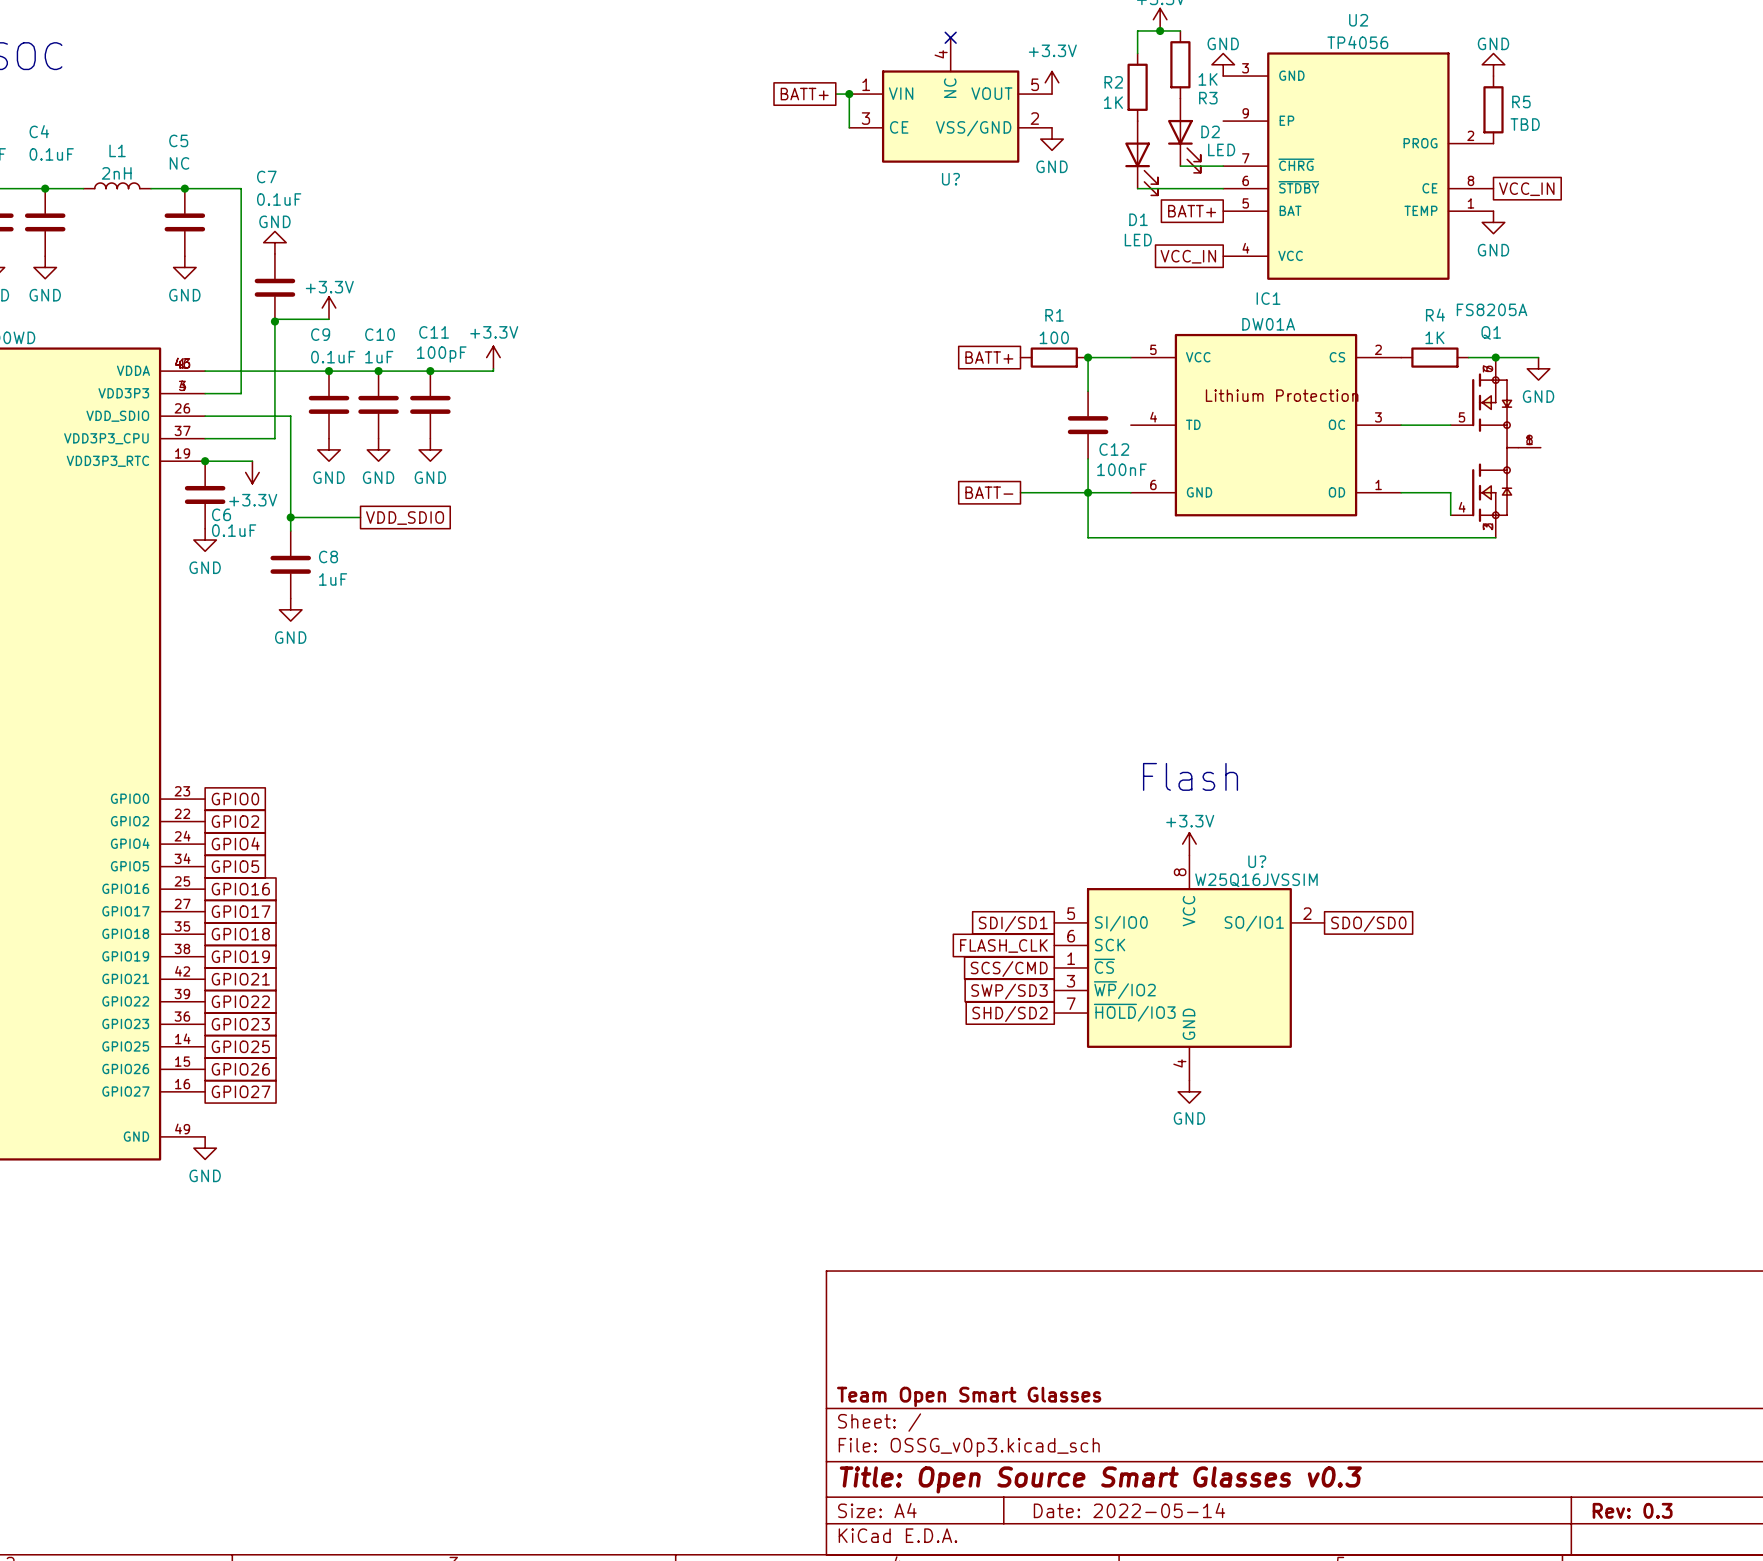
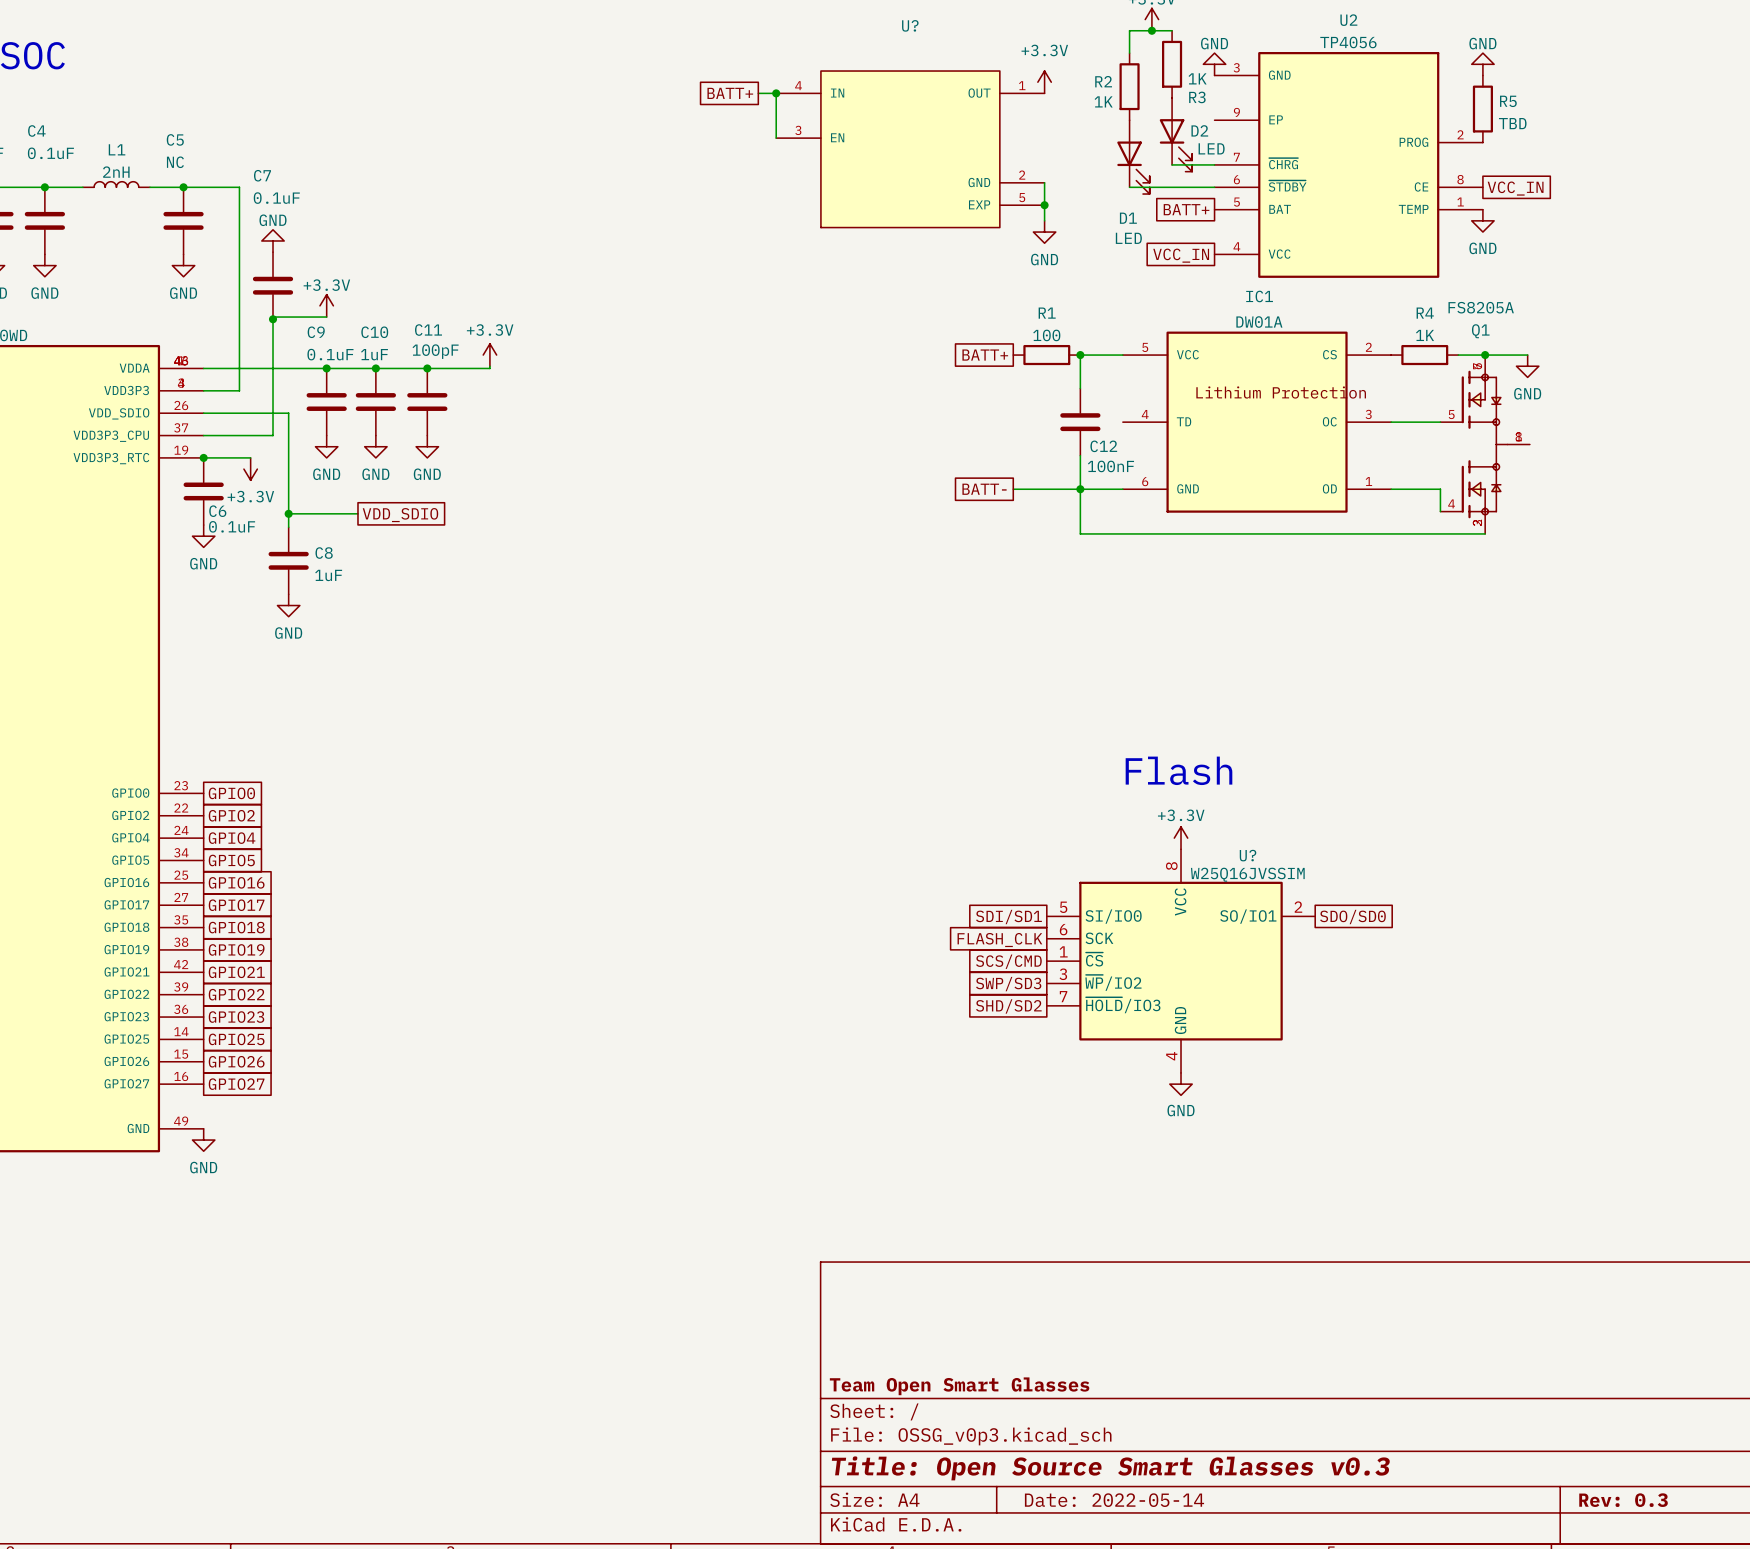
no-connect mark: (950, 37) -> none
wire: none -> (758, 93) (776, 93) (776, 138)
junction: none -> (776, 93)
global label position: BATT+ (804, 94) -> BATT+ (730, 93)
junction: (849, 94) -> none
U?: (950, 100) -> none
power symbol position: GND (1052, 139) -> GND (1044, 232)
U?: none -> (910, 149)
wire: none -> (1044, 182) (1044, 220)
junction: none -> (1044, 205)

